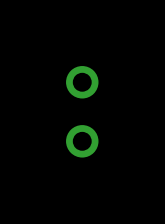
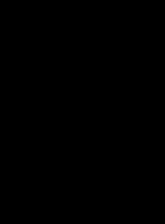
part: (82, 111) -> none

